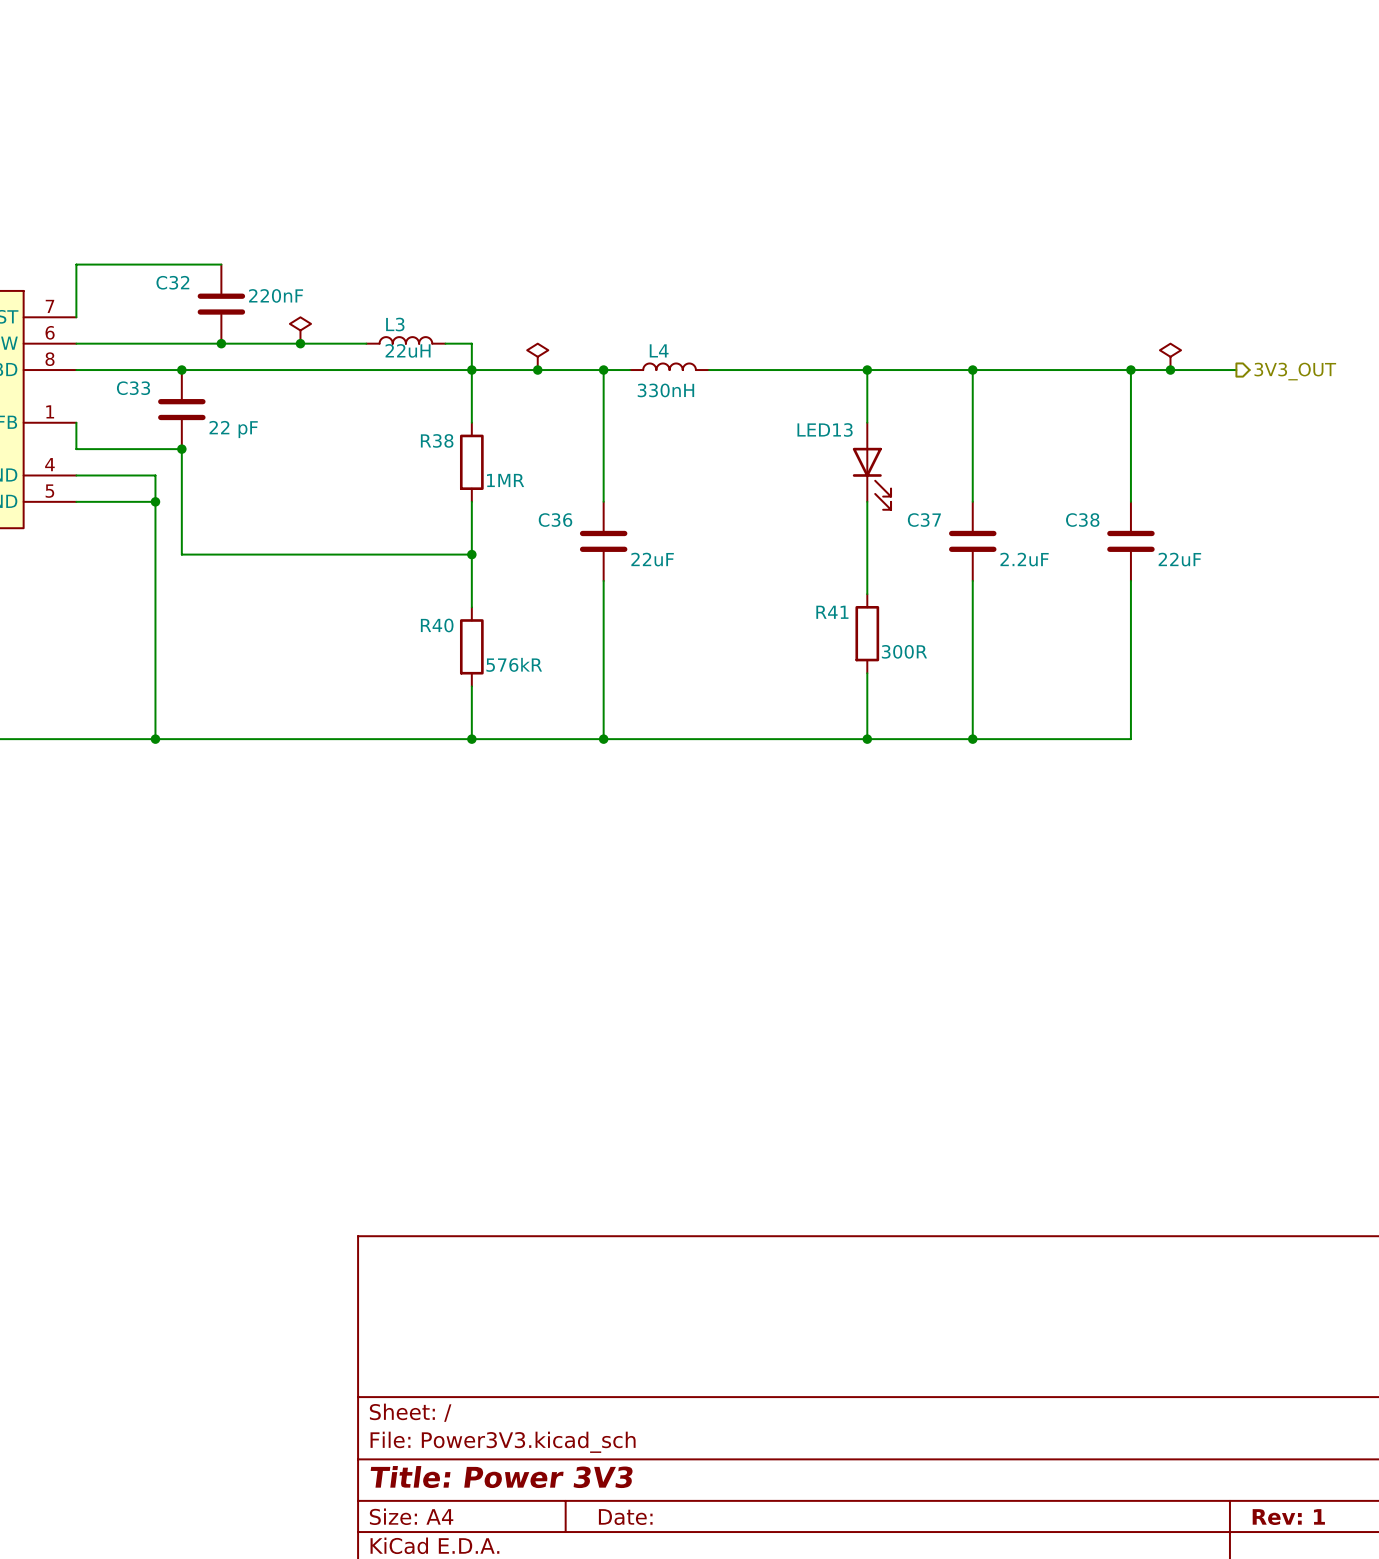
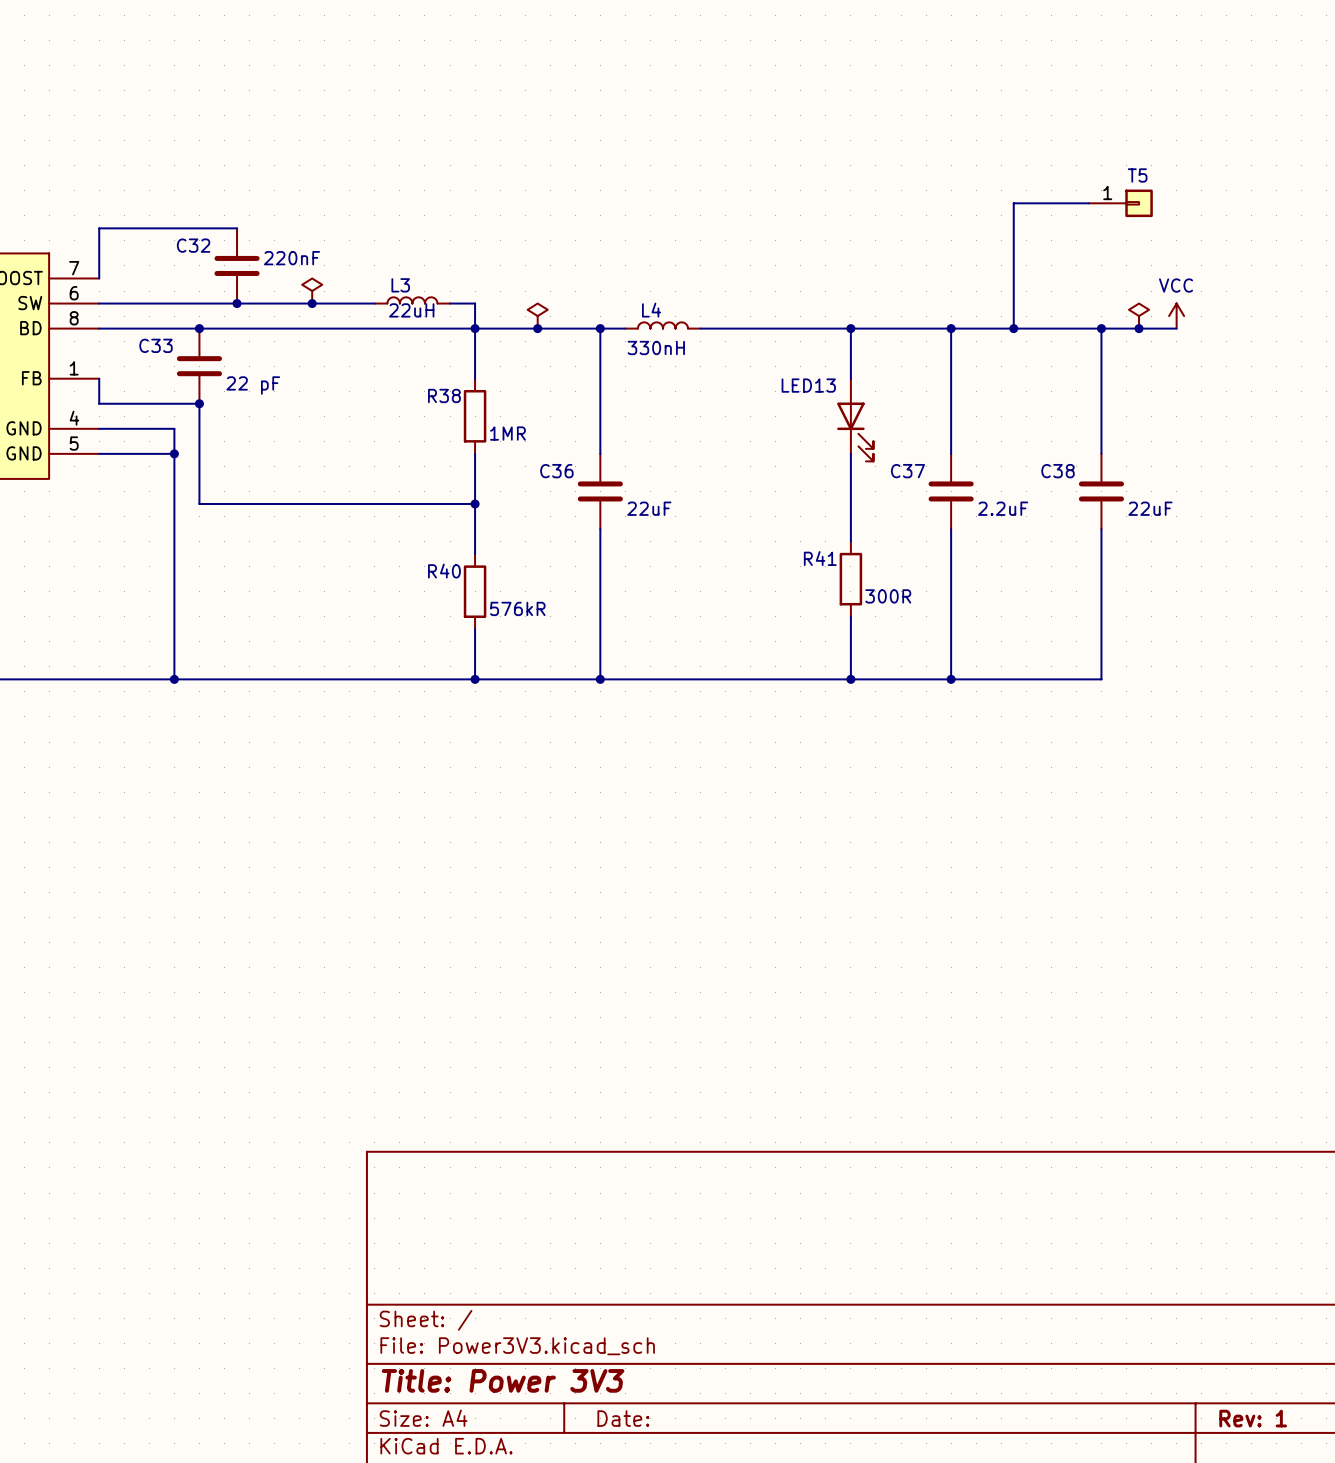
wire: none -> (1088, 203) (1013, 203) (1013, 328)
T5: none -> (1120, 203)
power symbol: none -> VCC (1176, 316)
junction: none -> (1013, 328)
wire: (1210, 370) (1236, 370) -> none
hierarchical label: 3V3_OUT (1295, 371) -> none

